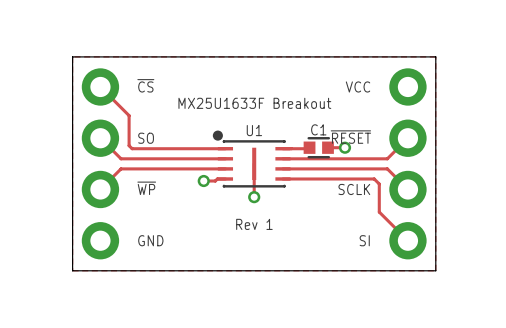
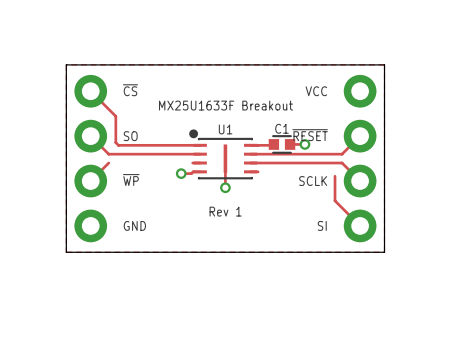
track: (121, 168) (216, 168) -> none
track: (291, 178) (374, 178) (379, 184) -> none

